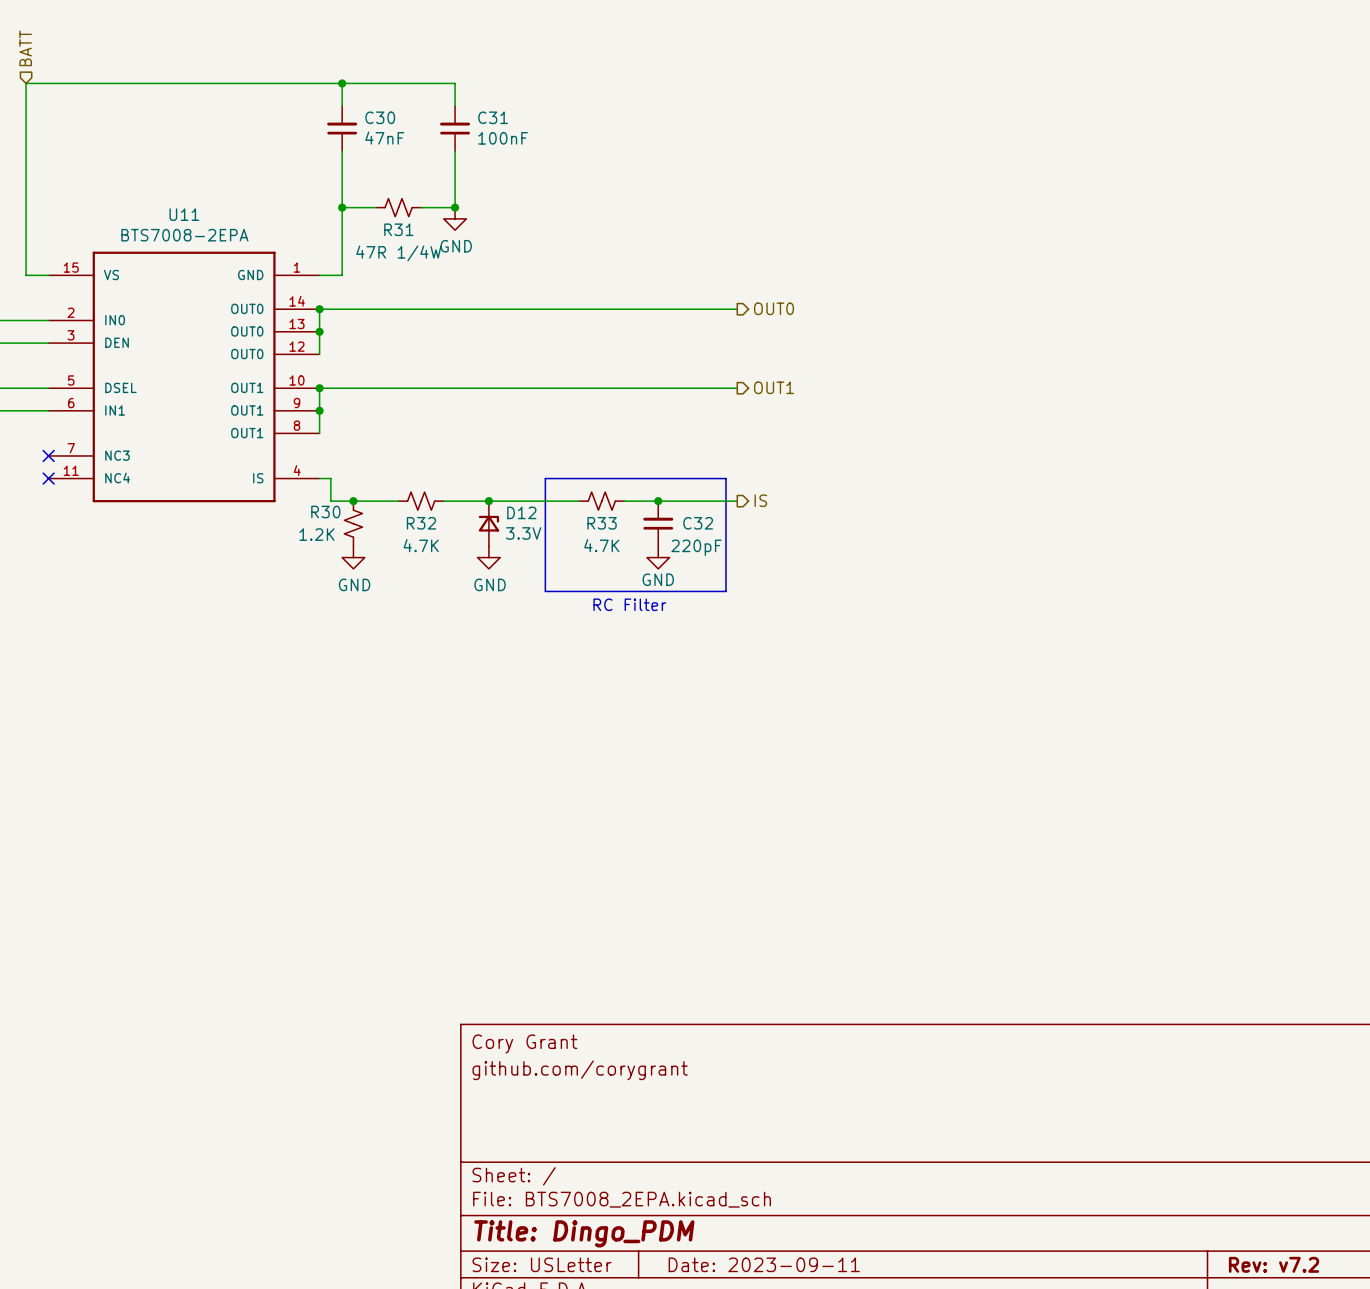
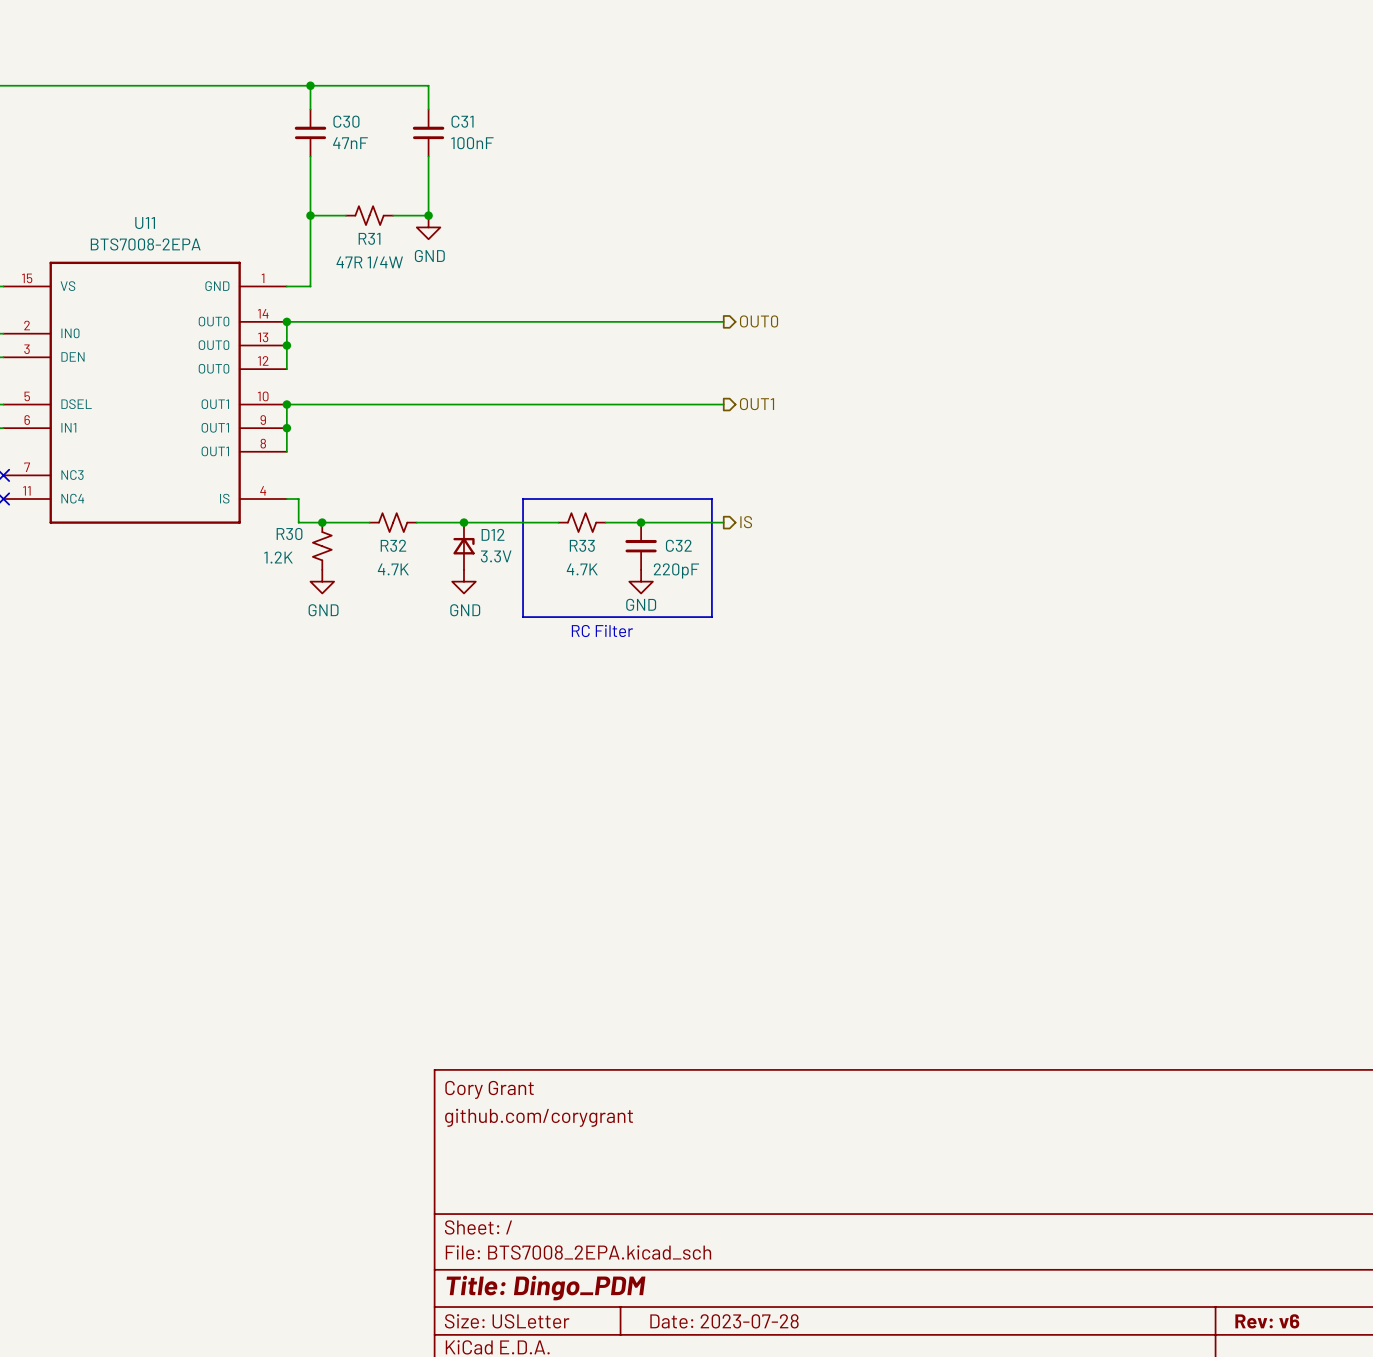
title block: Date: 2023-09-11 (764, 1264) -> Date: 2023-07-28 (724, 1321)
title block: Rev: v7.2 (1274, 1264) -> Rev: v6 (1267, 1321)

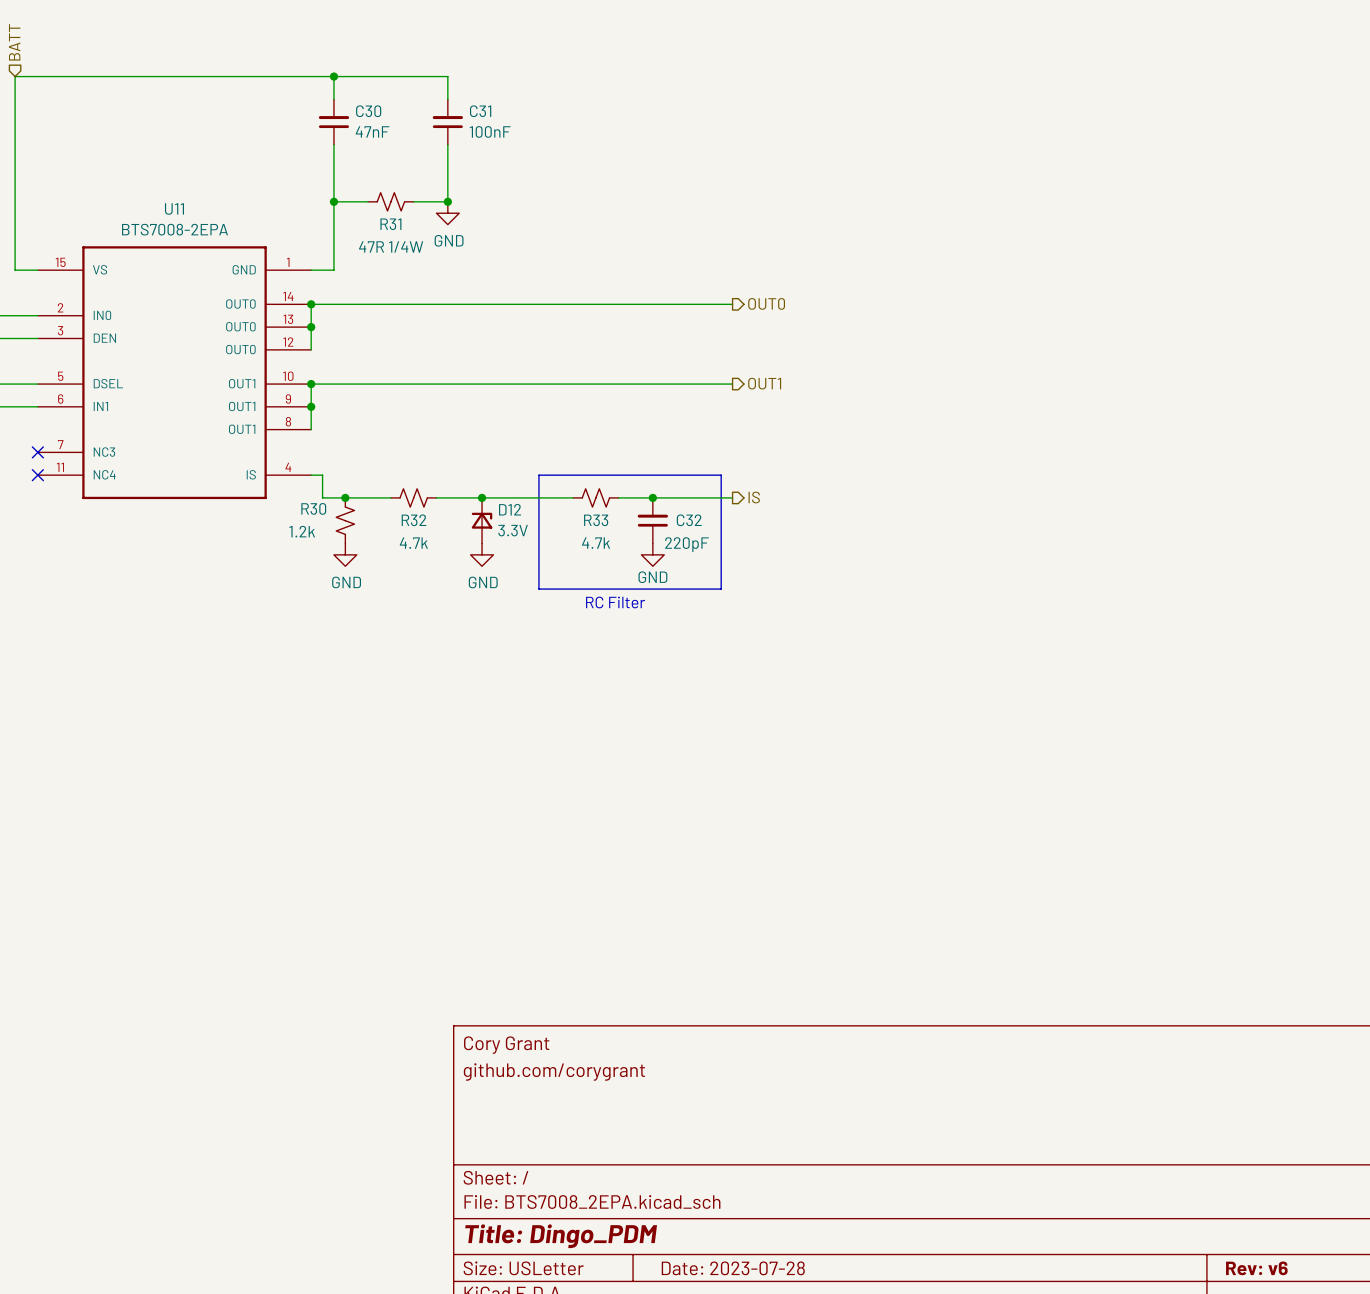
R30 value: 1.2K (278, 557) -> 1.2k (302, 531)
R32 value: 4.7K (393, 569) -> 4.7k (413, 543)
R33 value: 4.7K (582, 569) -> 4.7k (596, 543)

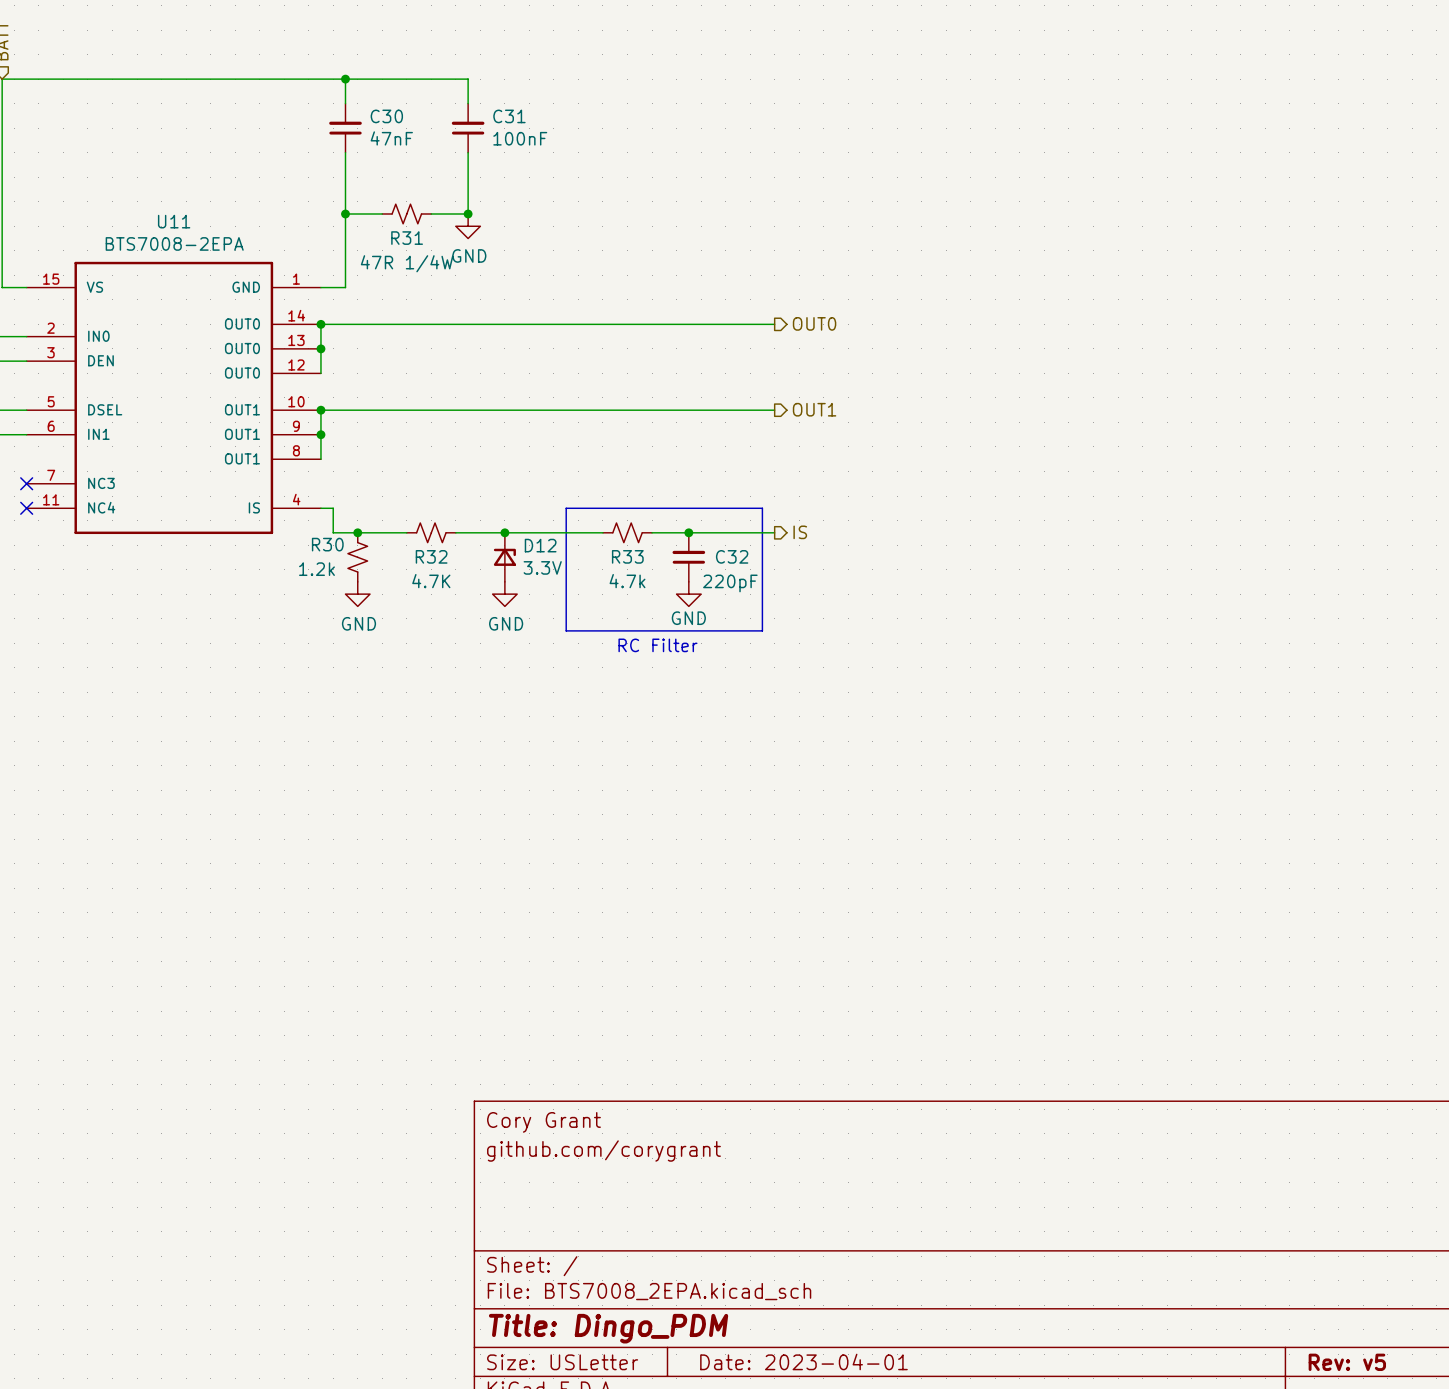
R32 value: 4.7k (413, 543) -> 4.7K (431, 581)
title block: Date: 2023-07-28 (733, 1268) -> Date: 2023-04-01 (803, 1361)
title block: Rev: v6 (1256, 1268) -> Rev: v5 (1347, 1362)

